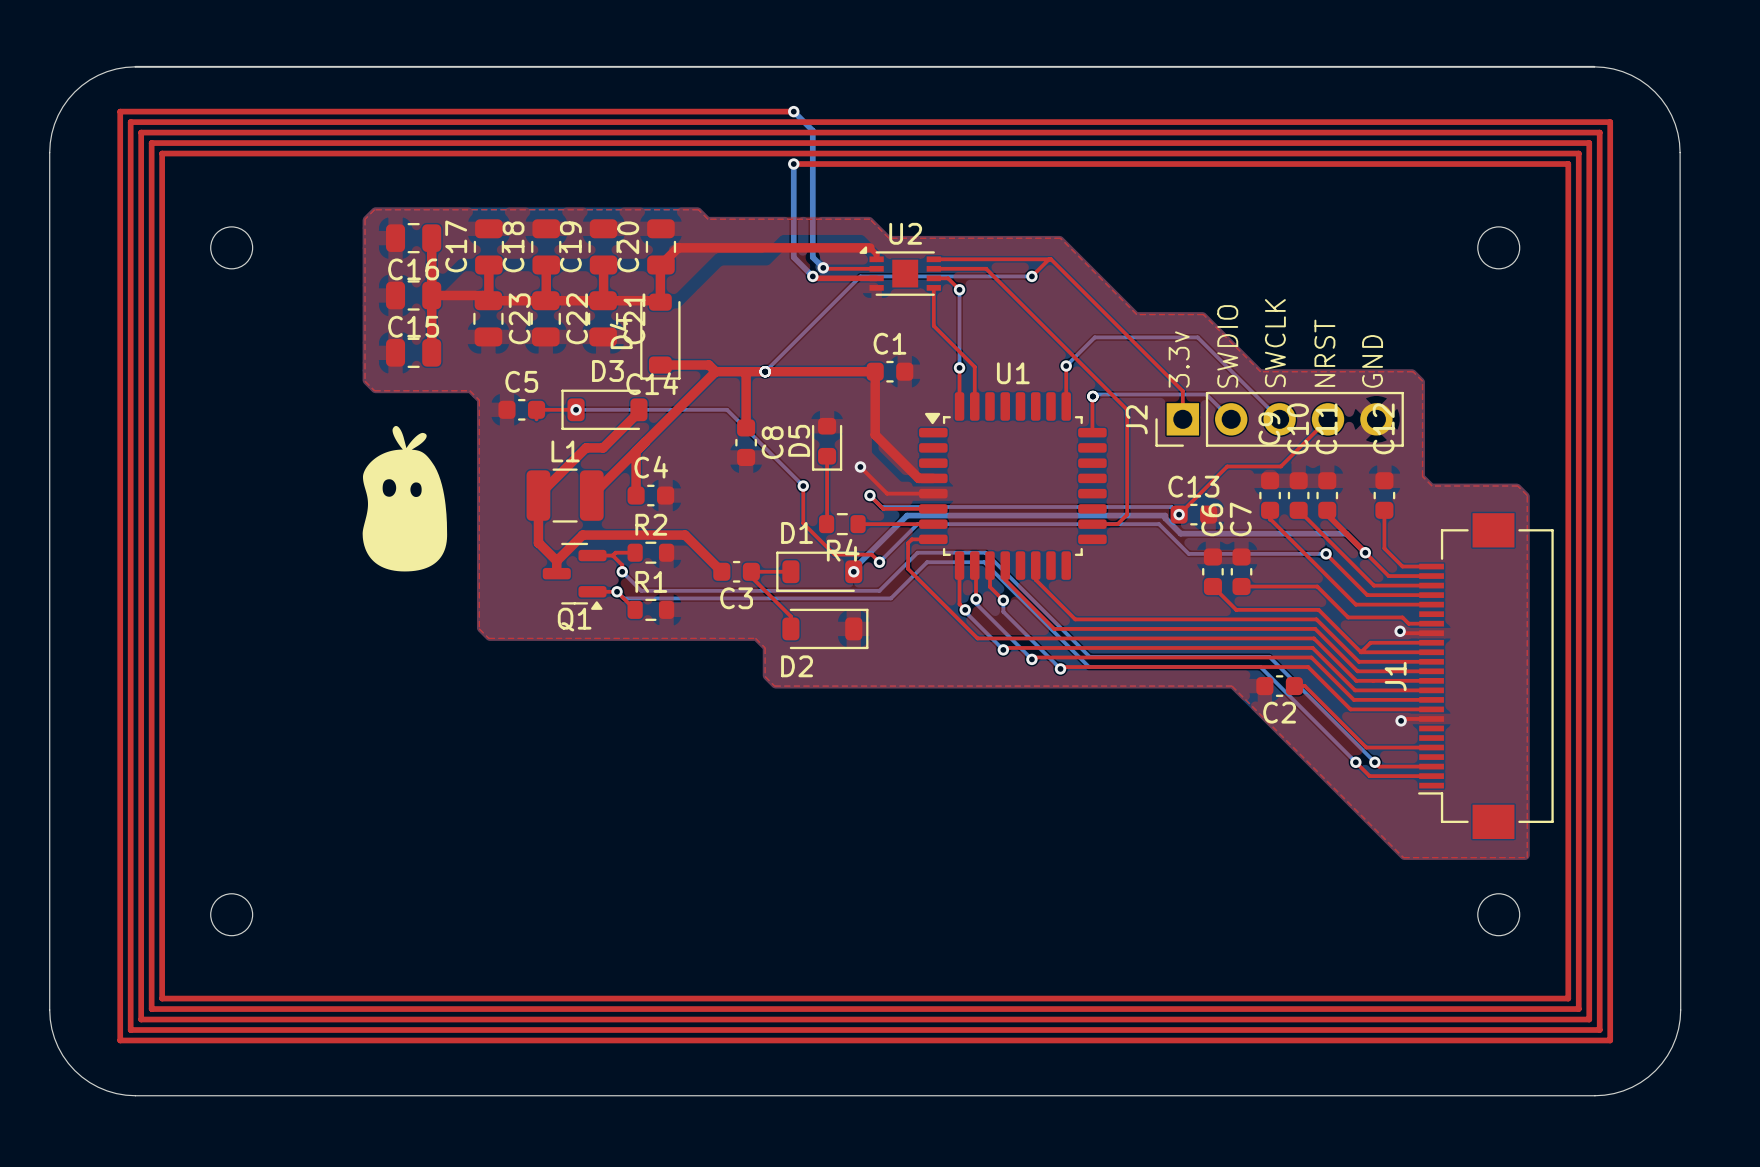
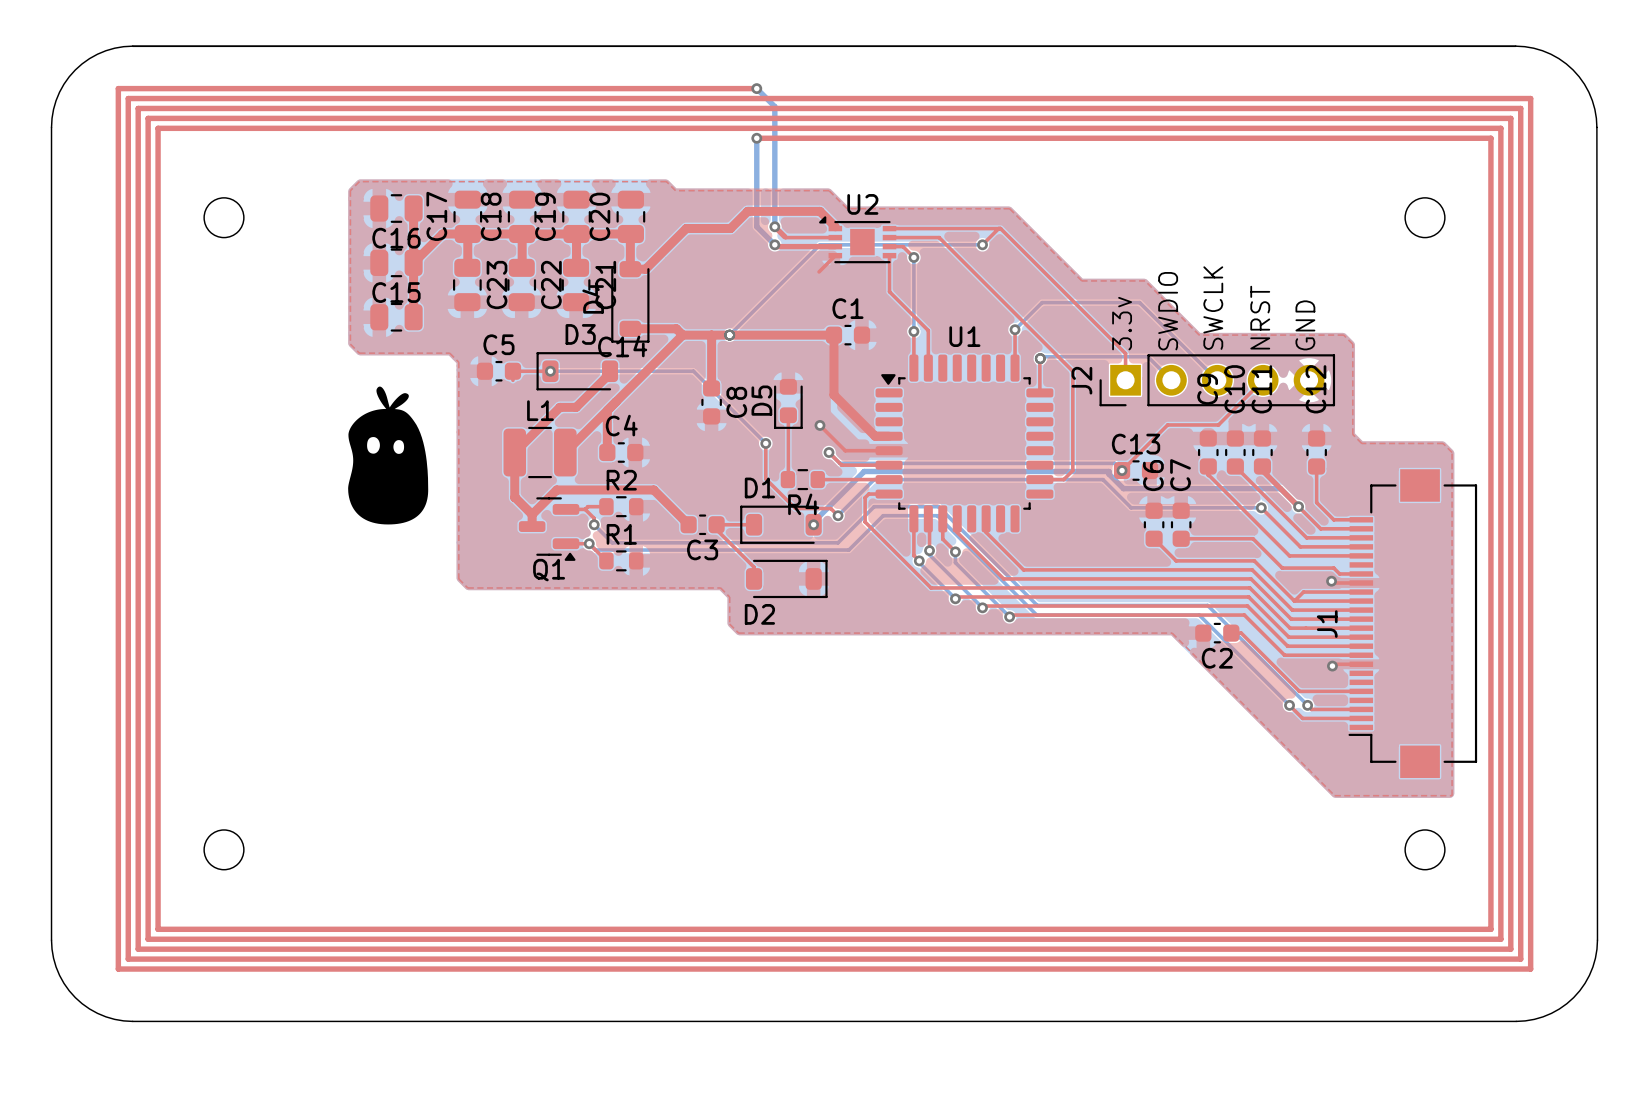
top track: none -> (774, 226) (784, 236)
bottom track: (812, 257) (823, 267) -> none
top track: none -> (835, 226) (819, 211) (747, 211) (730, 228) (686, 228) (645, 269) (630, 269)
top track: (876, 259) (876, 254) (869, 247) (678, 247) (660, 265) -> none
via position: (823, 267) -> (774, 226)
top track: none -> (835, 255) (819, 271)
top track: (431, 295) (483, 295) (488, 300) (660, 302) -> (413, 262) (442, 233) (630, 233)

